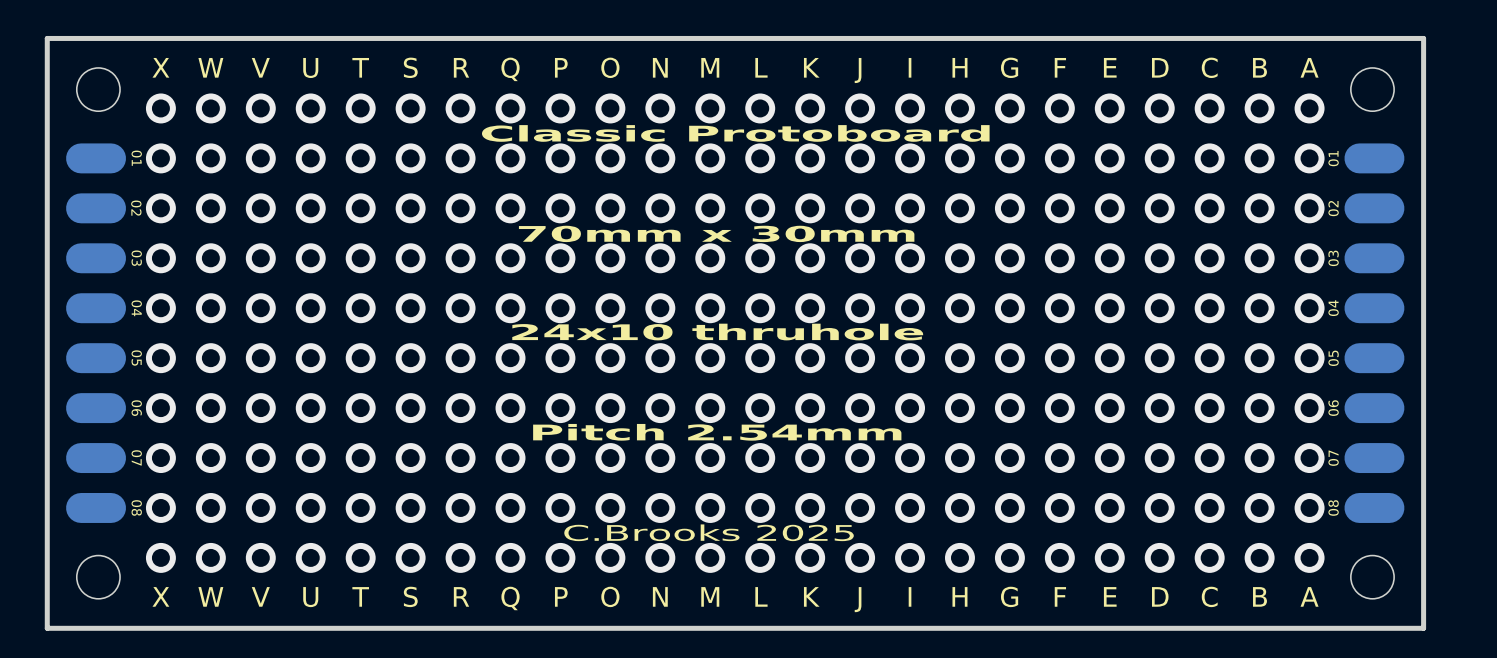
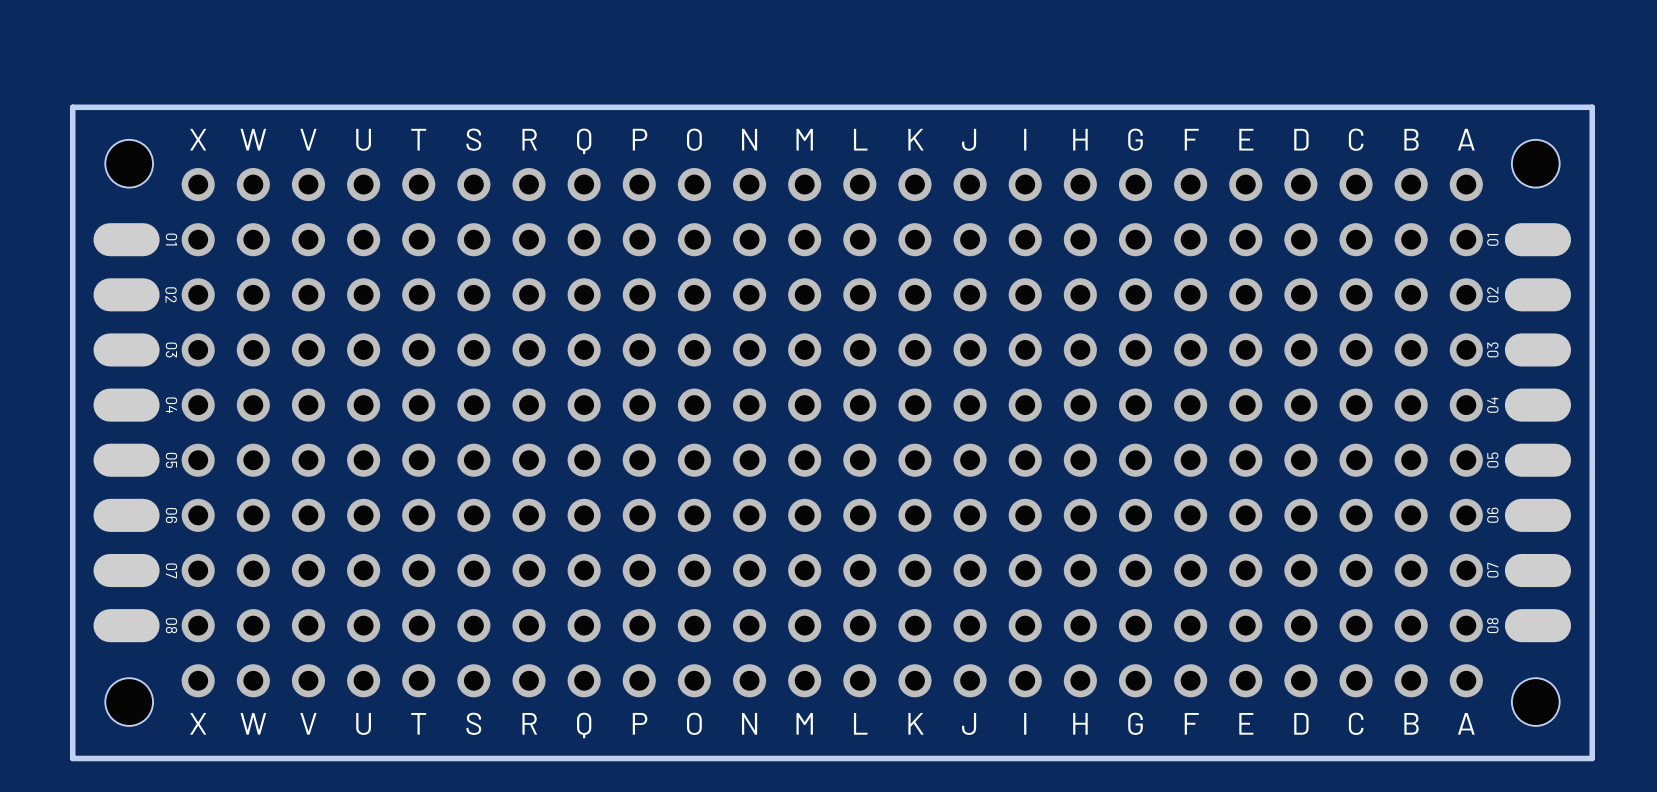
text: Classic Protoboard (735, 133) -> none
text: 70mm x 30mm (716, 233) -> none
text: 24x10 thruhole (717, 332) -> none
text: Pitch 2.54mm (717, 432) -> none
text: C.Brooks 2025 (709, 532) -> none

